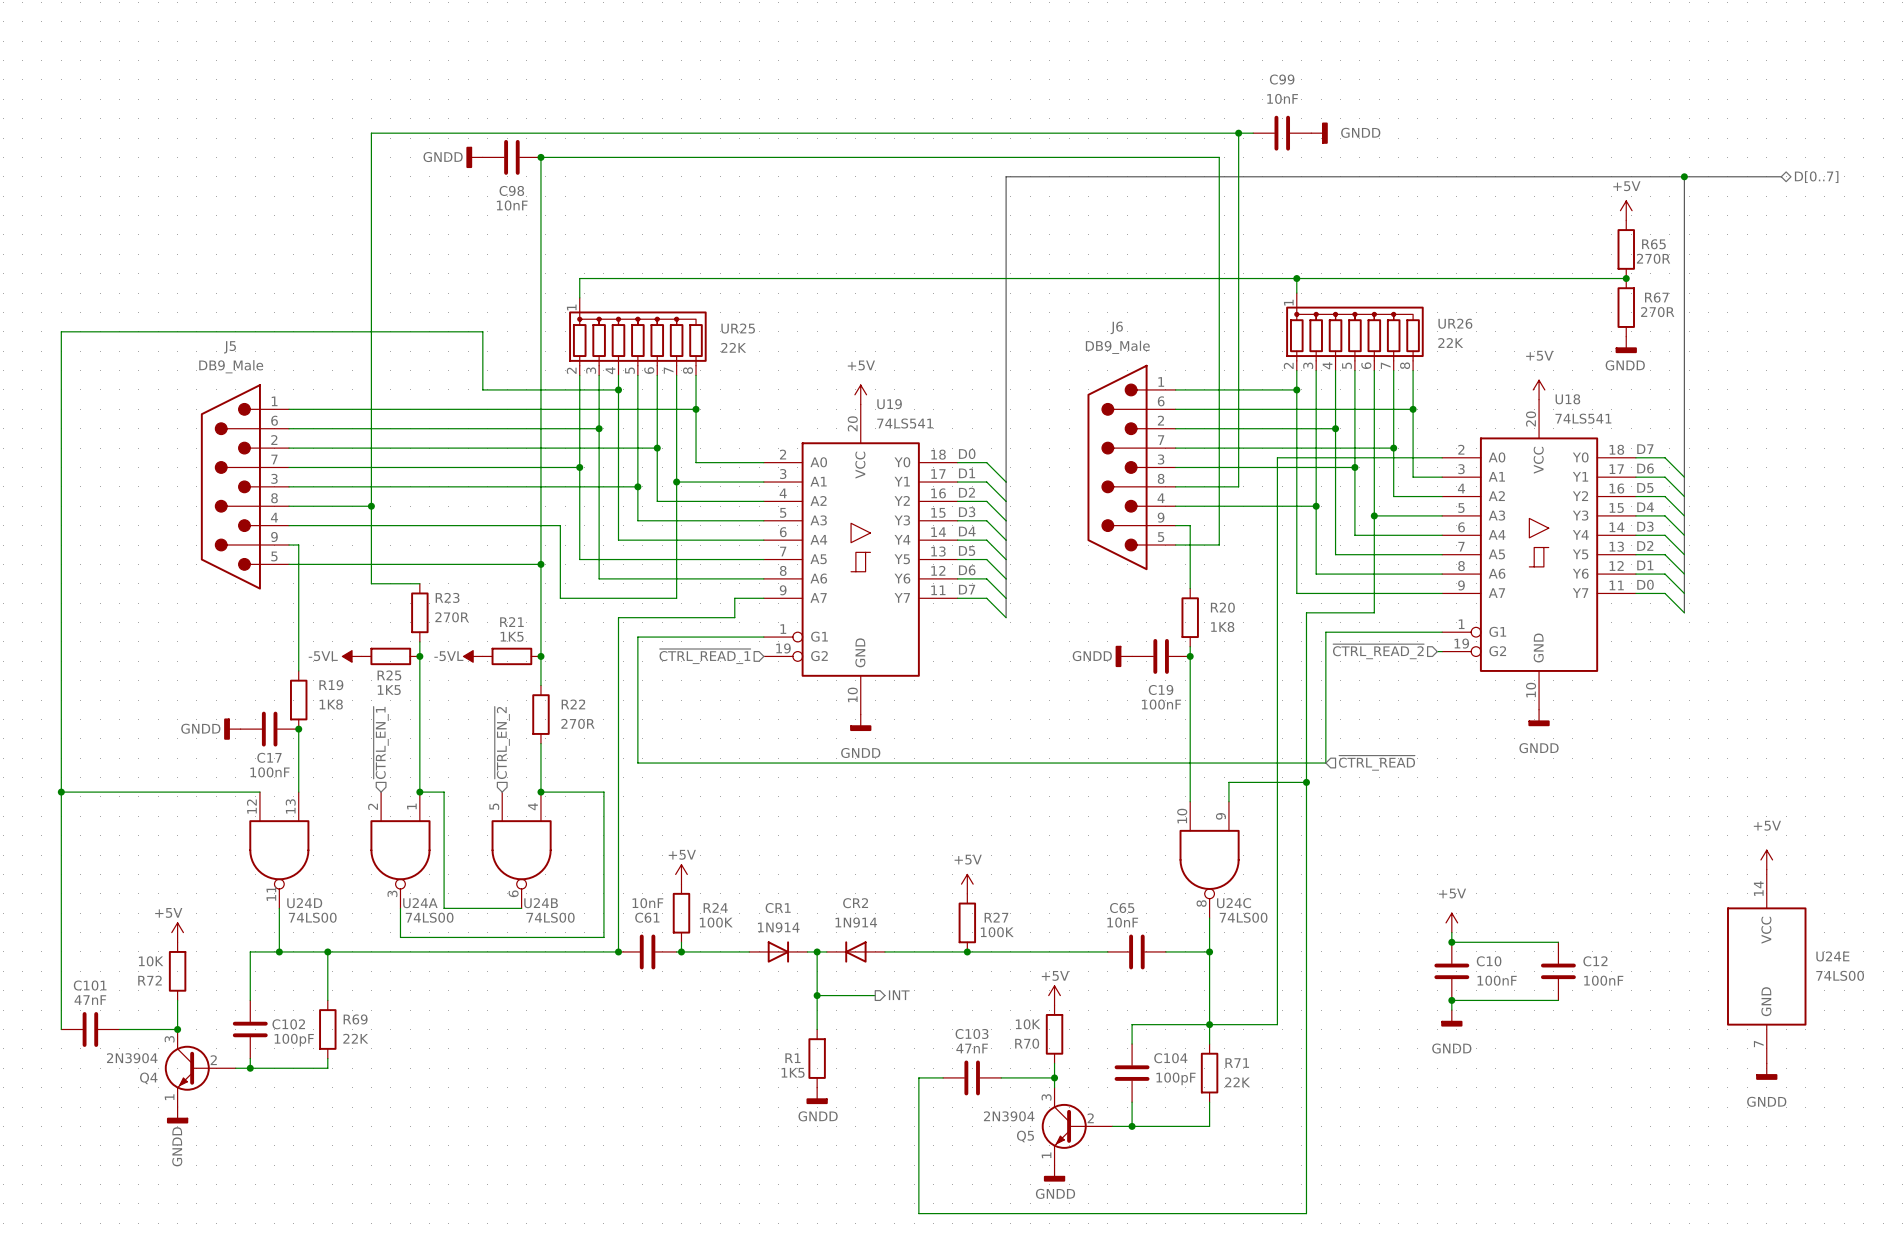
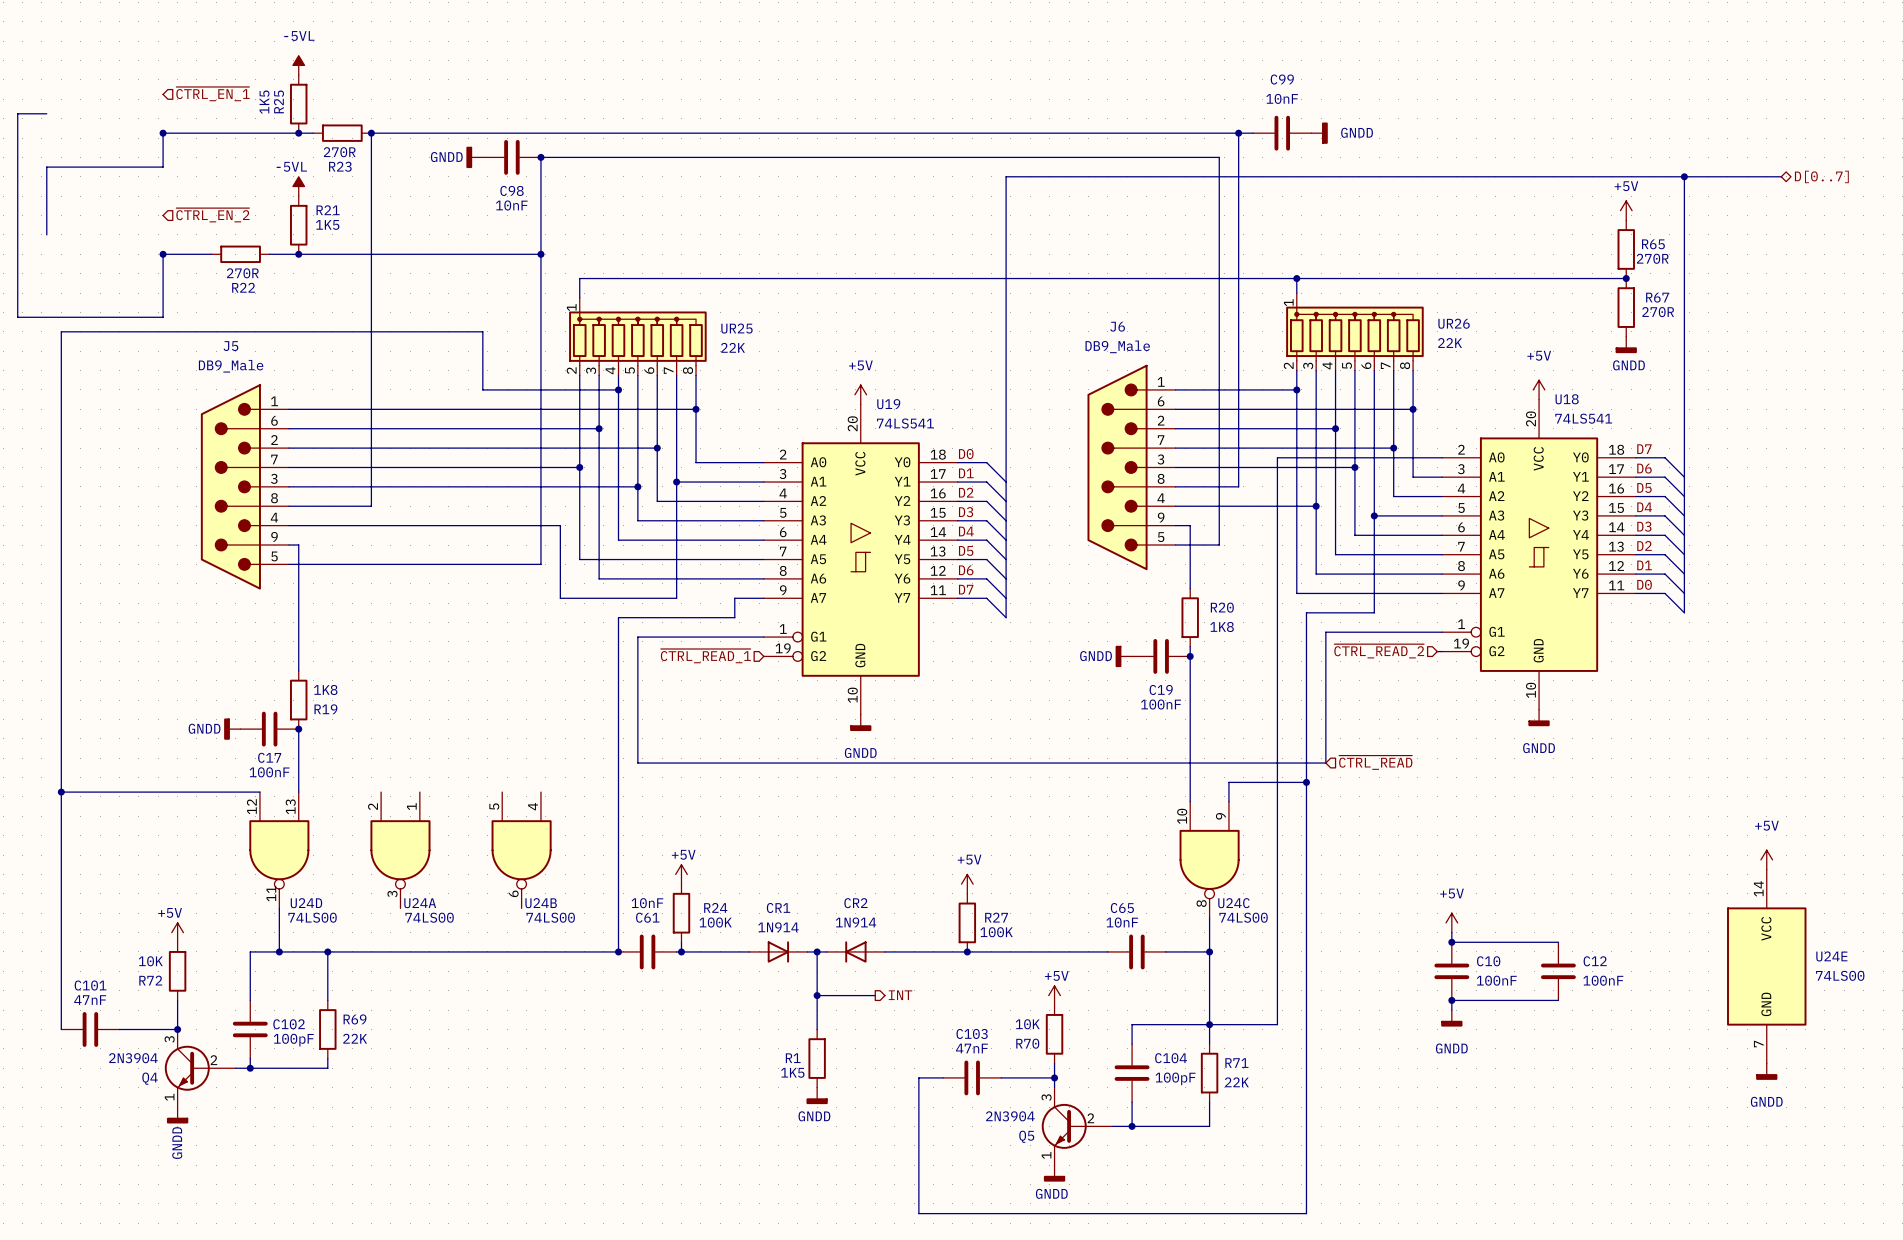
power symbol: none -> -5VL (298, 65)
hierarchical label: none -> ~{CTRL_EN_1} (213, 94)
wire: none -> (46, 113) (17, 113) (17, 317) (163, 317) (163, 254) (211, 254)
junction: none -> (163, 133)
junction: none -> (298, 133)
wire: none -> (313, 133) (163, 133) (163, 167) (46, 167) (46, 234)
junction: none -> (371, 133)
power symbol: none -> -5VL (298, 186)
hierarchical label: none -> ~{CTRL_EN_2} (212, 215)
junction: none -> (163, 254)
wire: none -> (269, 254) (540, 254)
junction: none -> (298, 254)
junction: none -> (540, 254)
wire: (371, 506) (371, 583) (419, 583) -> none
junction: (371, 506) -> none
wire: (540, 564) (540, 685) -> none
junction: (540, 564) -> none
R23 rotation: 0° (419, 612) -> 90° clockwise (342, 133)
R23 position: (419, 612) -> (342, 133)
R23 value position: 270R (451, 617) -> 270R (339, 152)
wire: (419, 641) (419, 792) (444, 792) (444, 908) (521, 908) -> none
power symbol: -5VL (352, 656) -> none
R25 rotation: 0° (390, 656) -> 90° clockwise (298, 104)
R25 position: (390, 656) -> (298, 104)
junction: (419, 656) -> none
power symbol: -5VL (473, 656) -> none
R21 rotation: 0° (511, 656) -> 90° clockwise (298, 225)
R21 position: (511, 656) -> (298, 225)
junction: (540, 656) -> none
R19 name position: R19 (331, 685) -> R19 (325, 709)
R19 value position: 1K8 (331, 704) -> 1K8 (325, 689)
R22 rotation: 0° (540, 714) -> 90° clockwise (240, 254)
R22 position: (540, 714) -> (240, 254)
R22 value position: 270R (577, 723) -> 270R (242, 273)
hierarchical label: ~{CTRL_EN_1} (381, 742) -> none
hierarchical label: ~{CTRL_EN_2} (502, 742) -> none
wire: (540, 743) (540, 792) (603, 792) (603, 937) (400, 937) (400, 908) -> none
junction: (419, 792) -> none
junction: (540, 792) -> none

